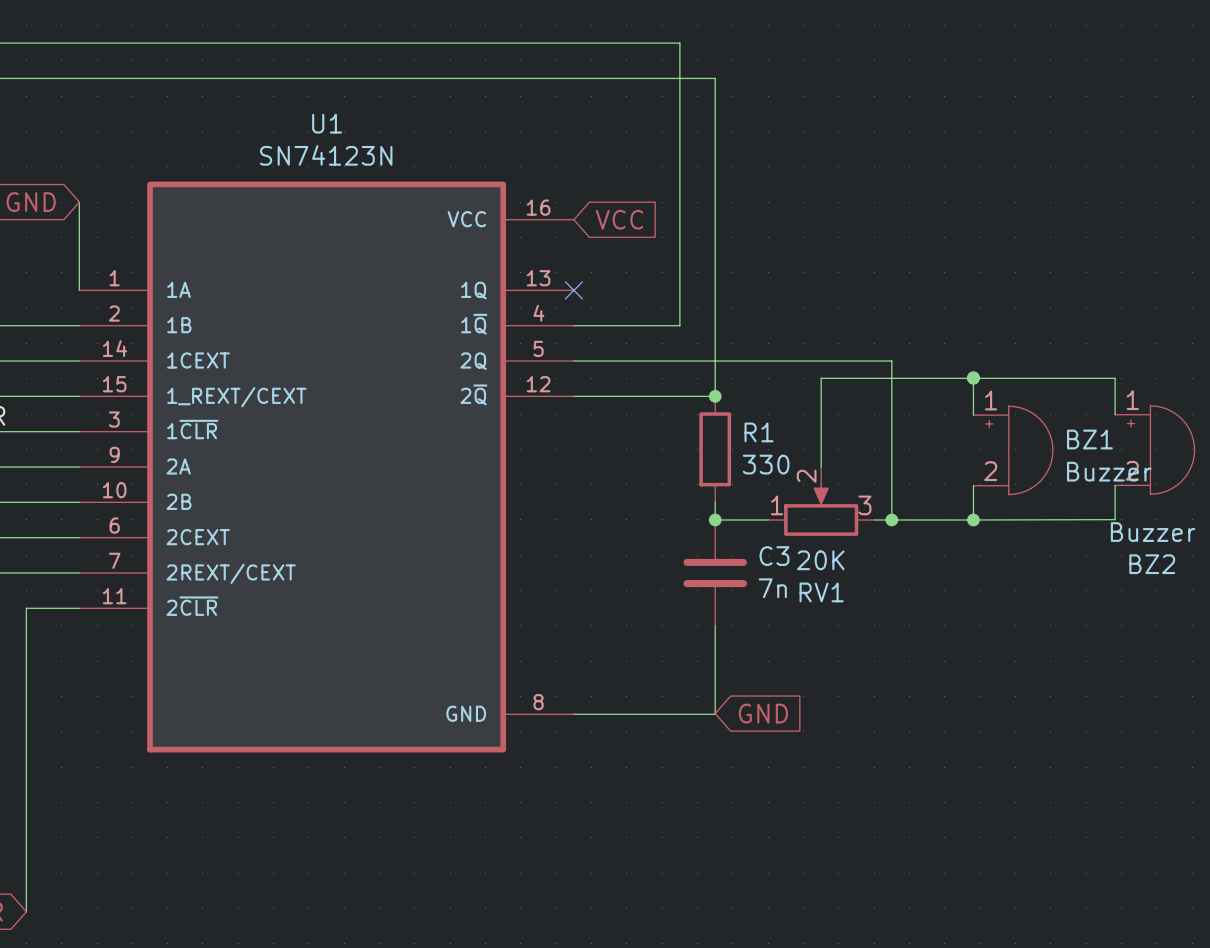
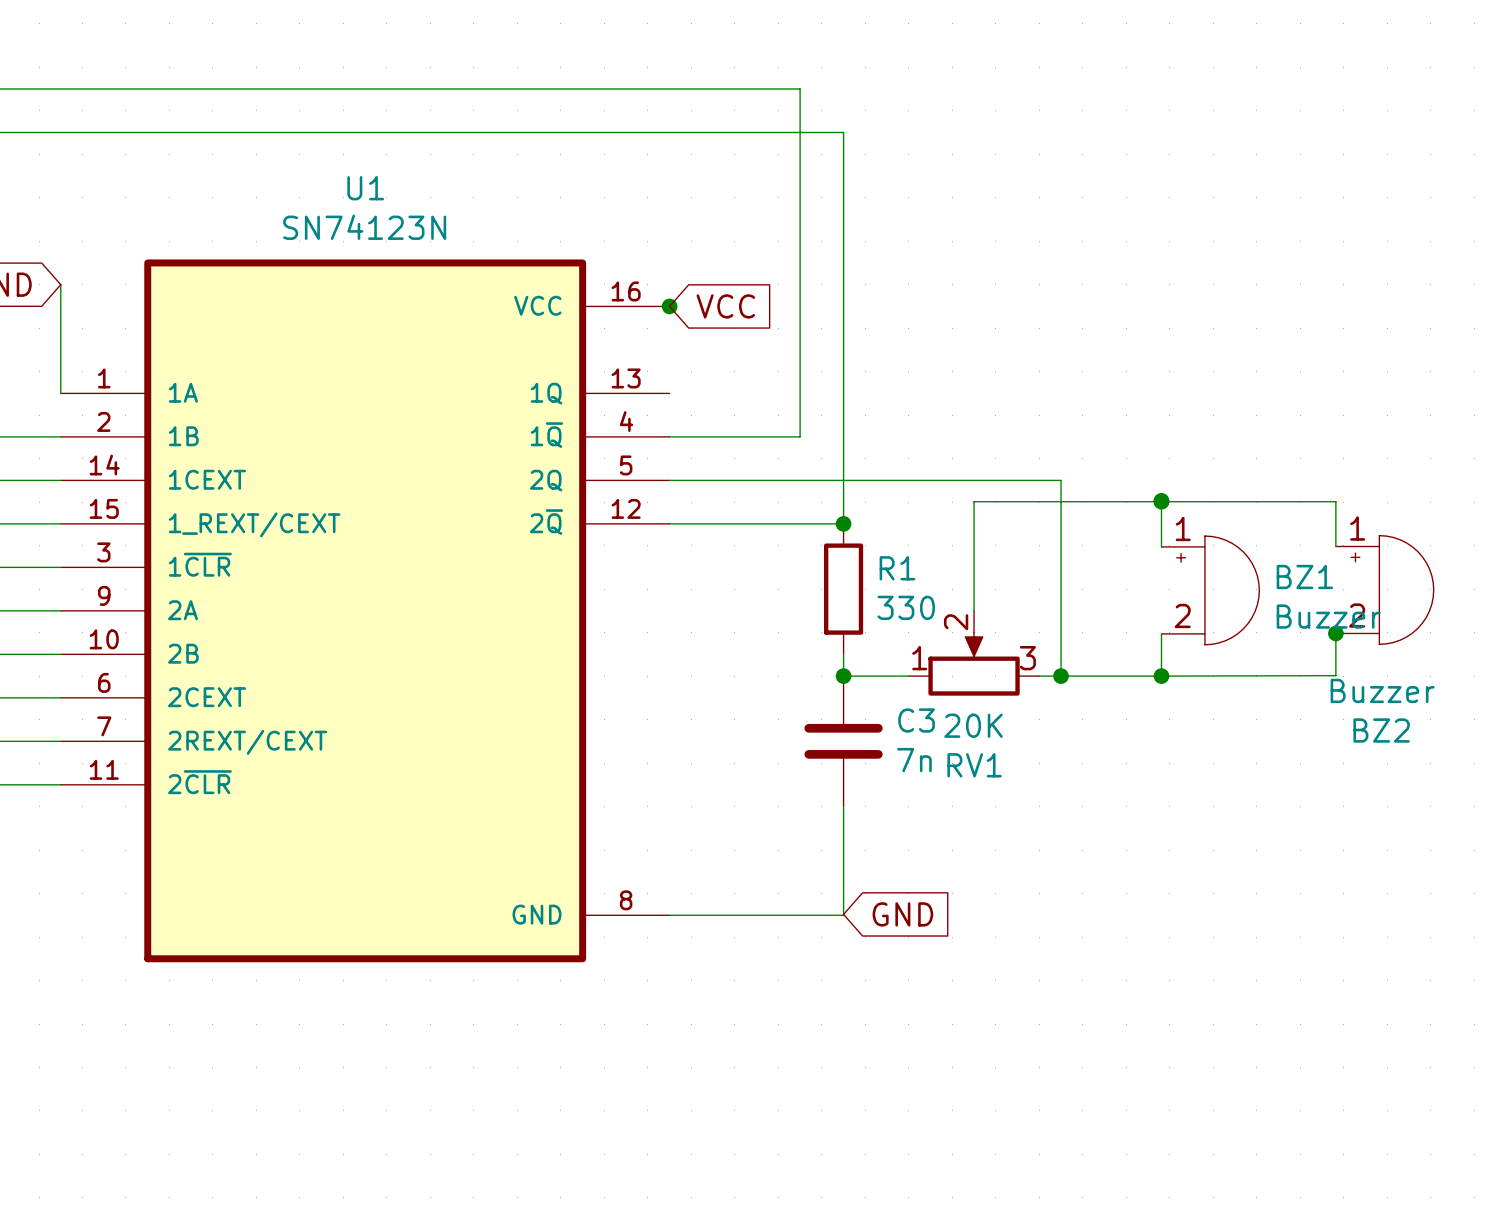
junction: none -> (669, 306)
no-connect mark: (573, 290) -> none
junction: none -> (1335, 633)

